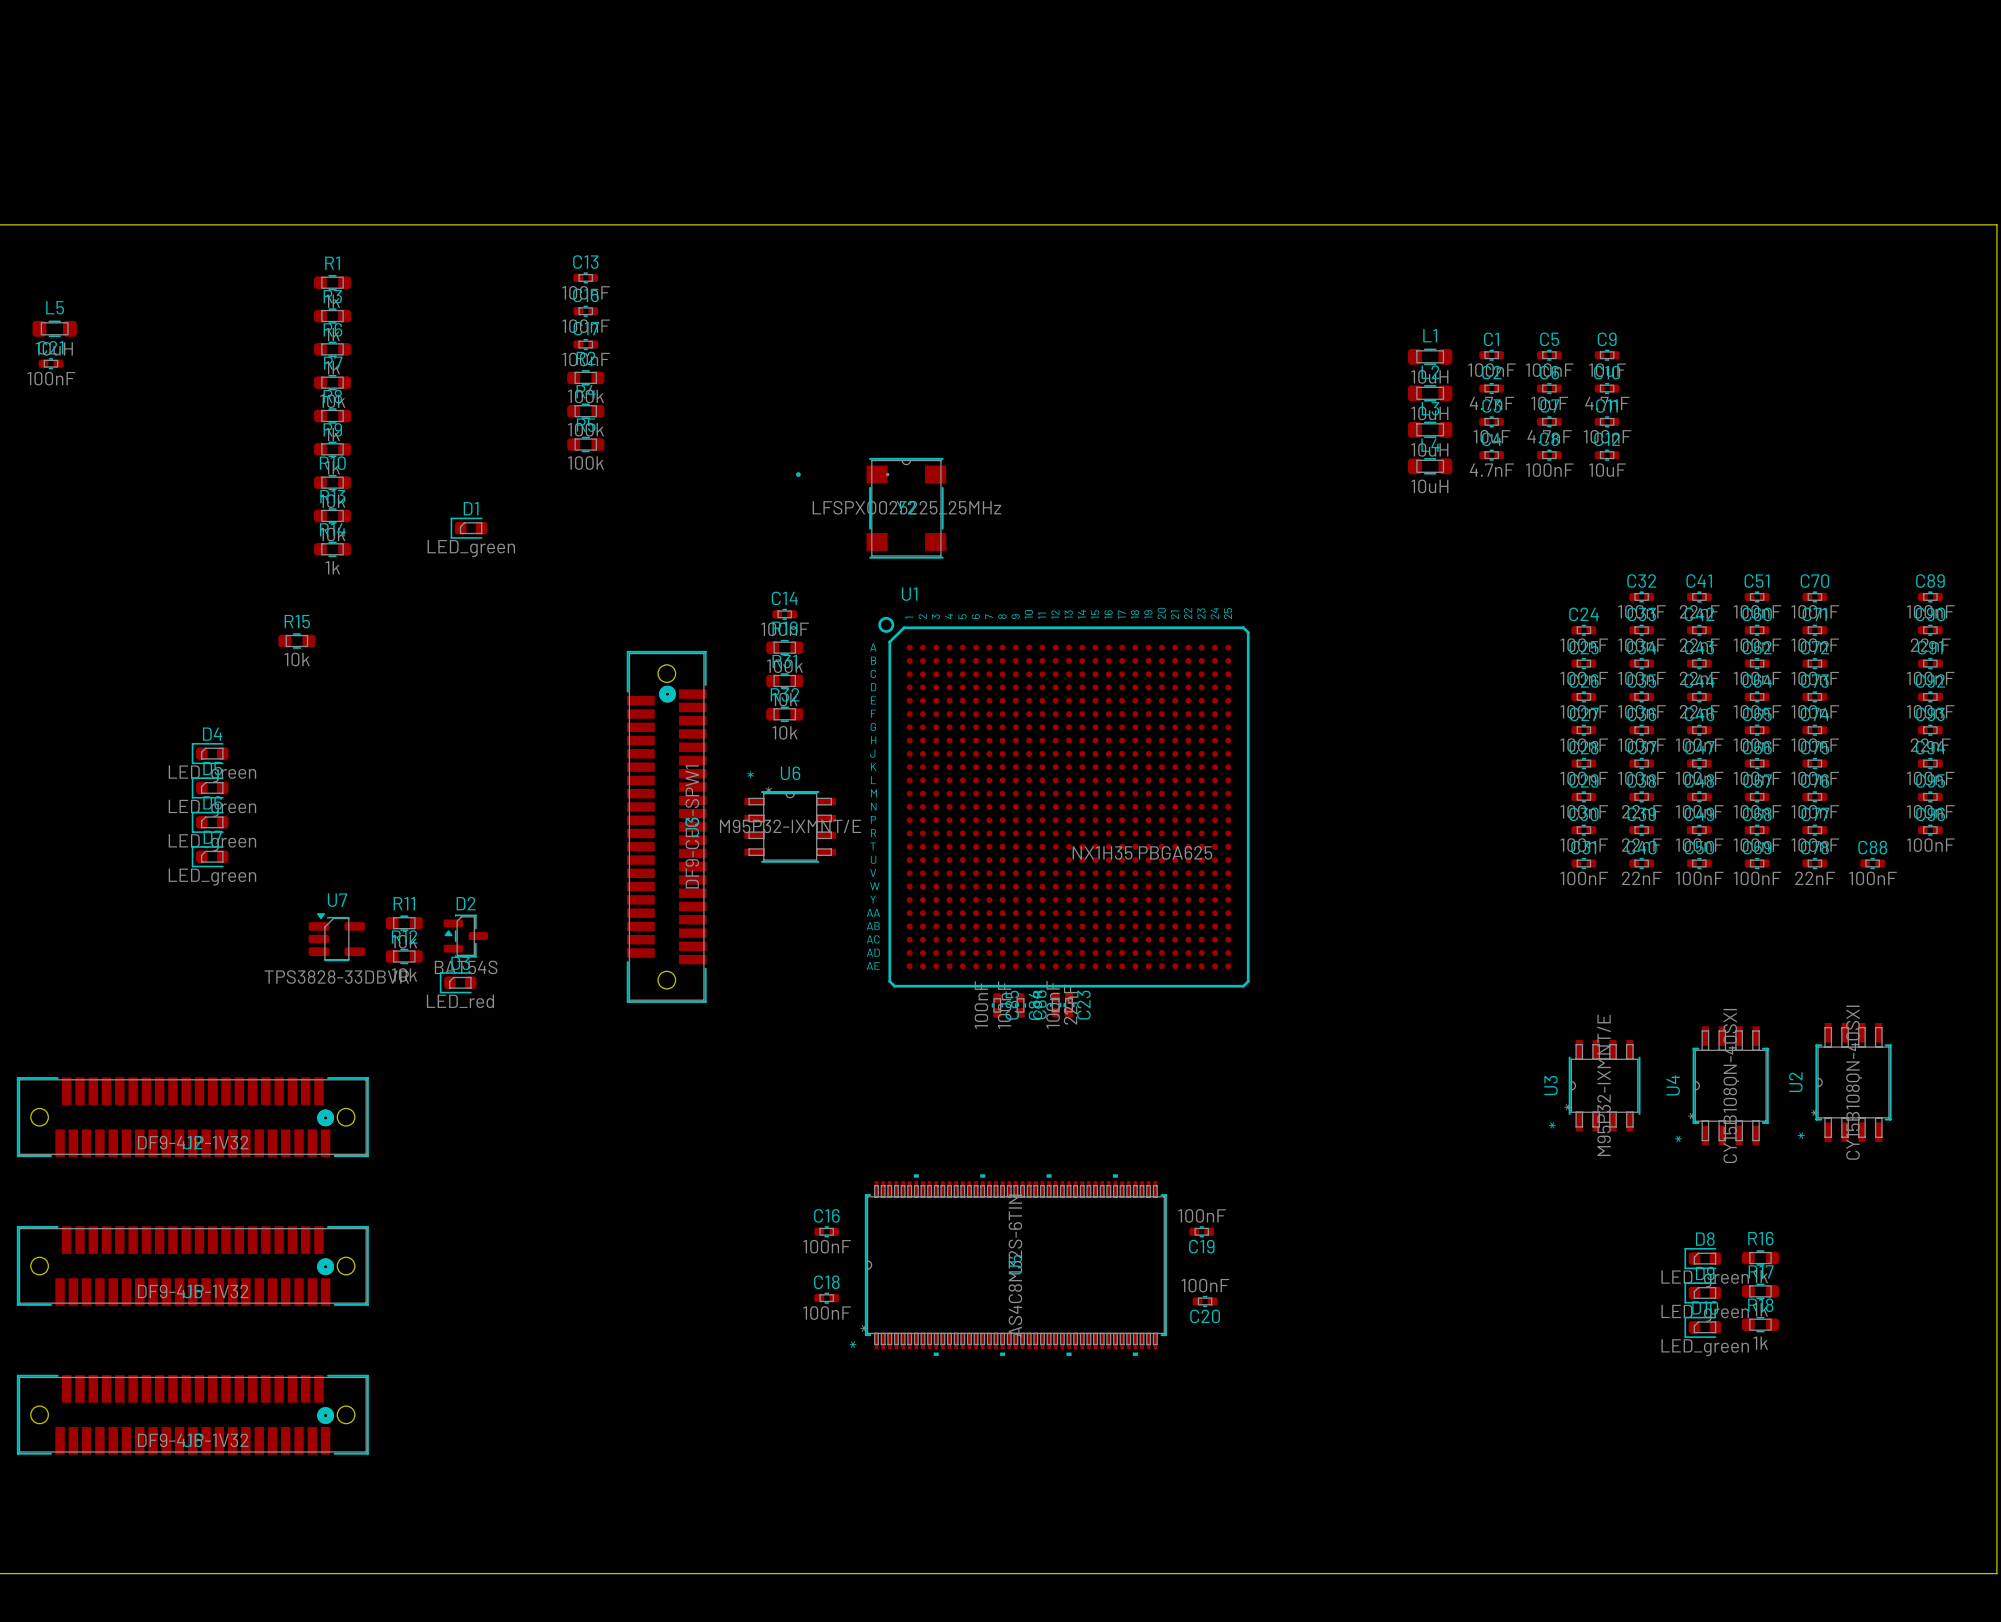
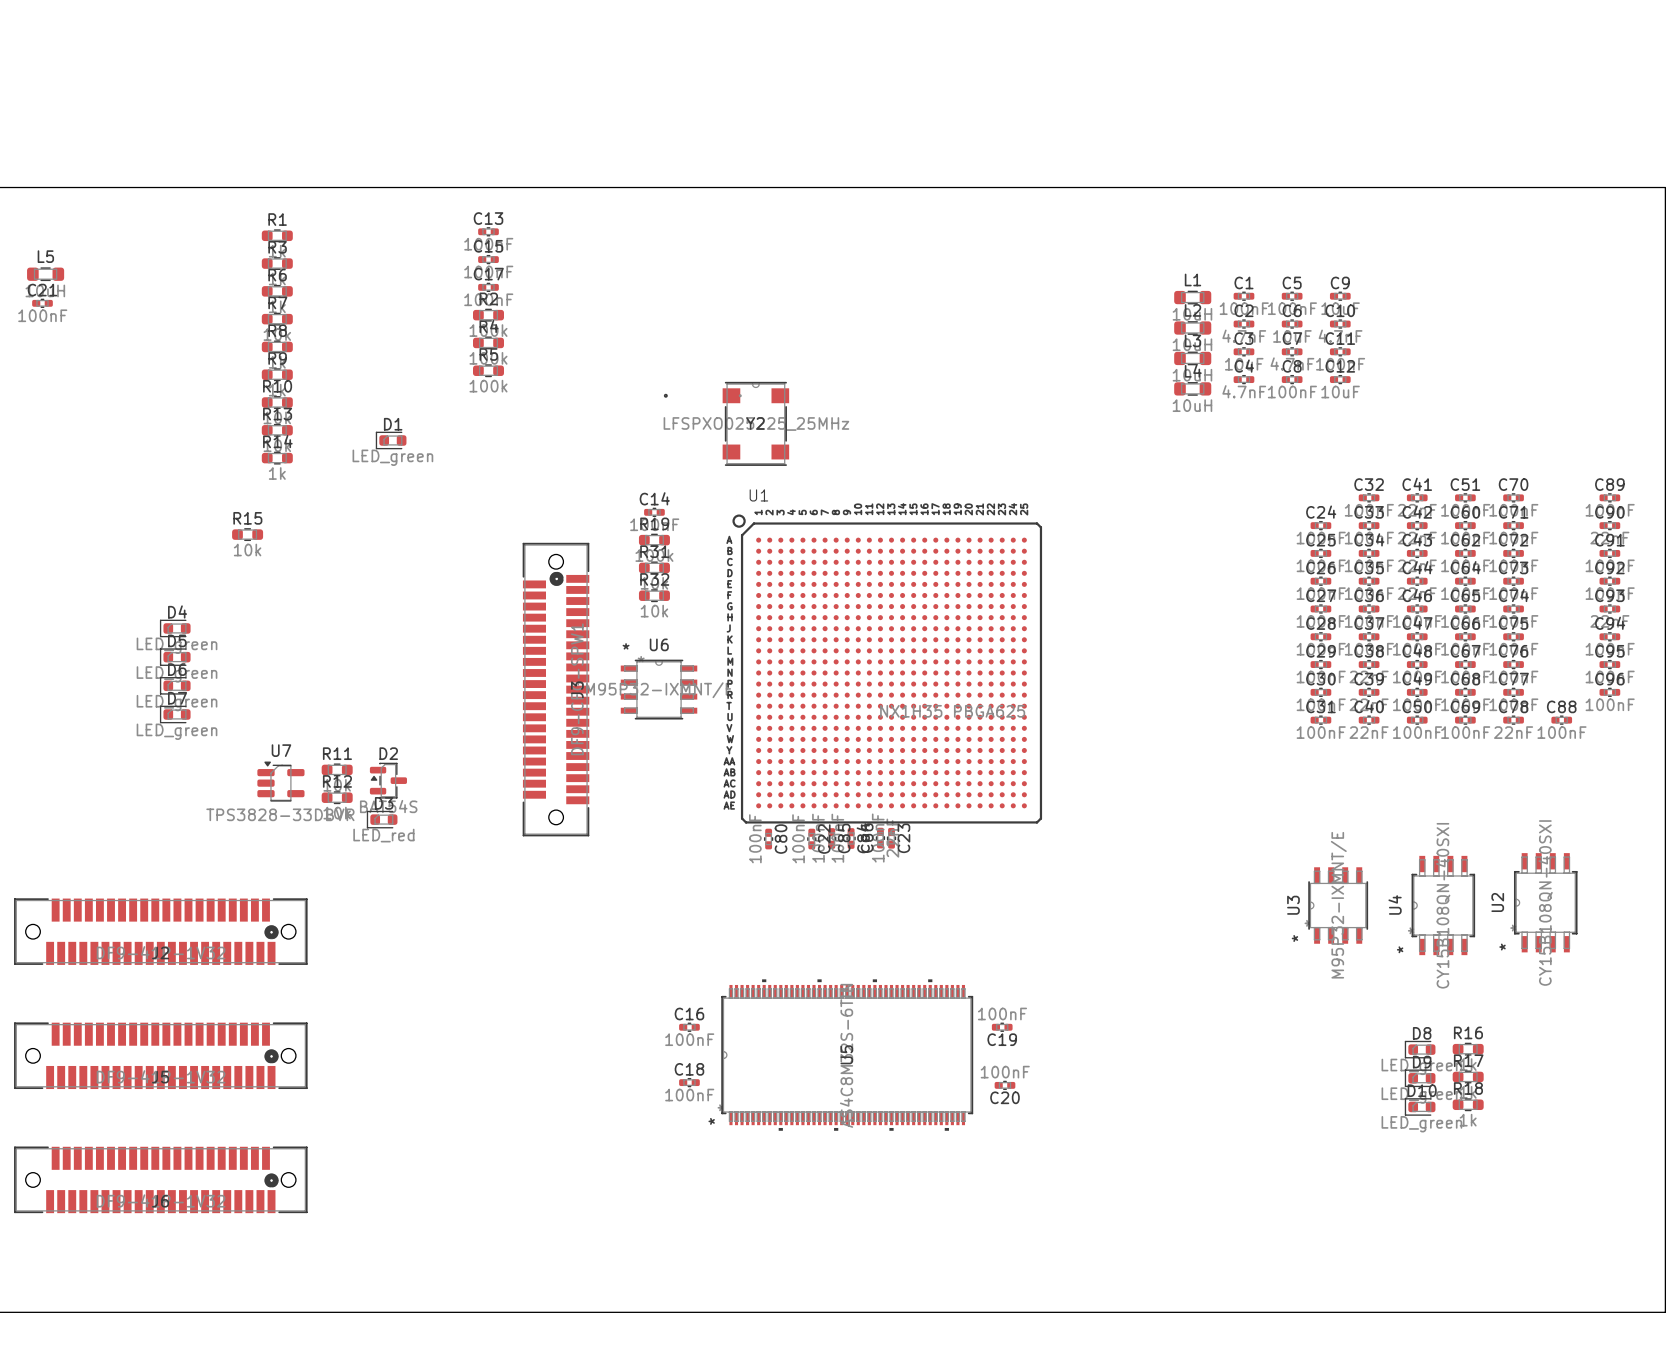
C80: none -> 100nF (768, 839)
C22: none -> 100nF (811, 839)

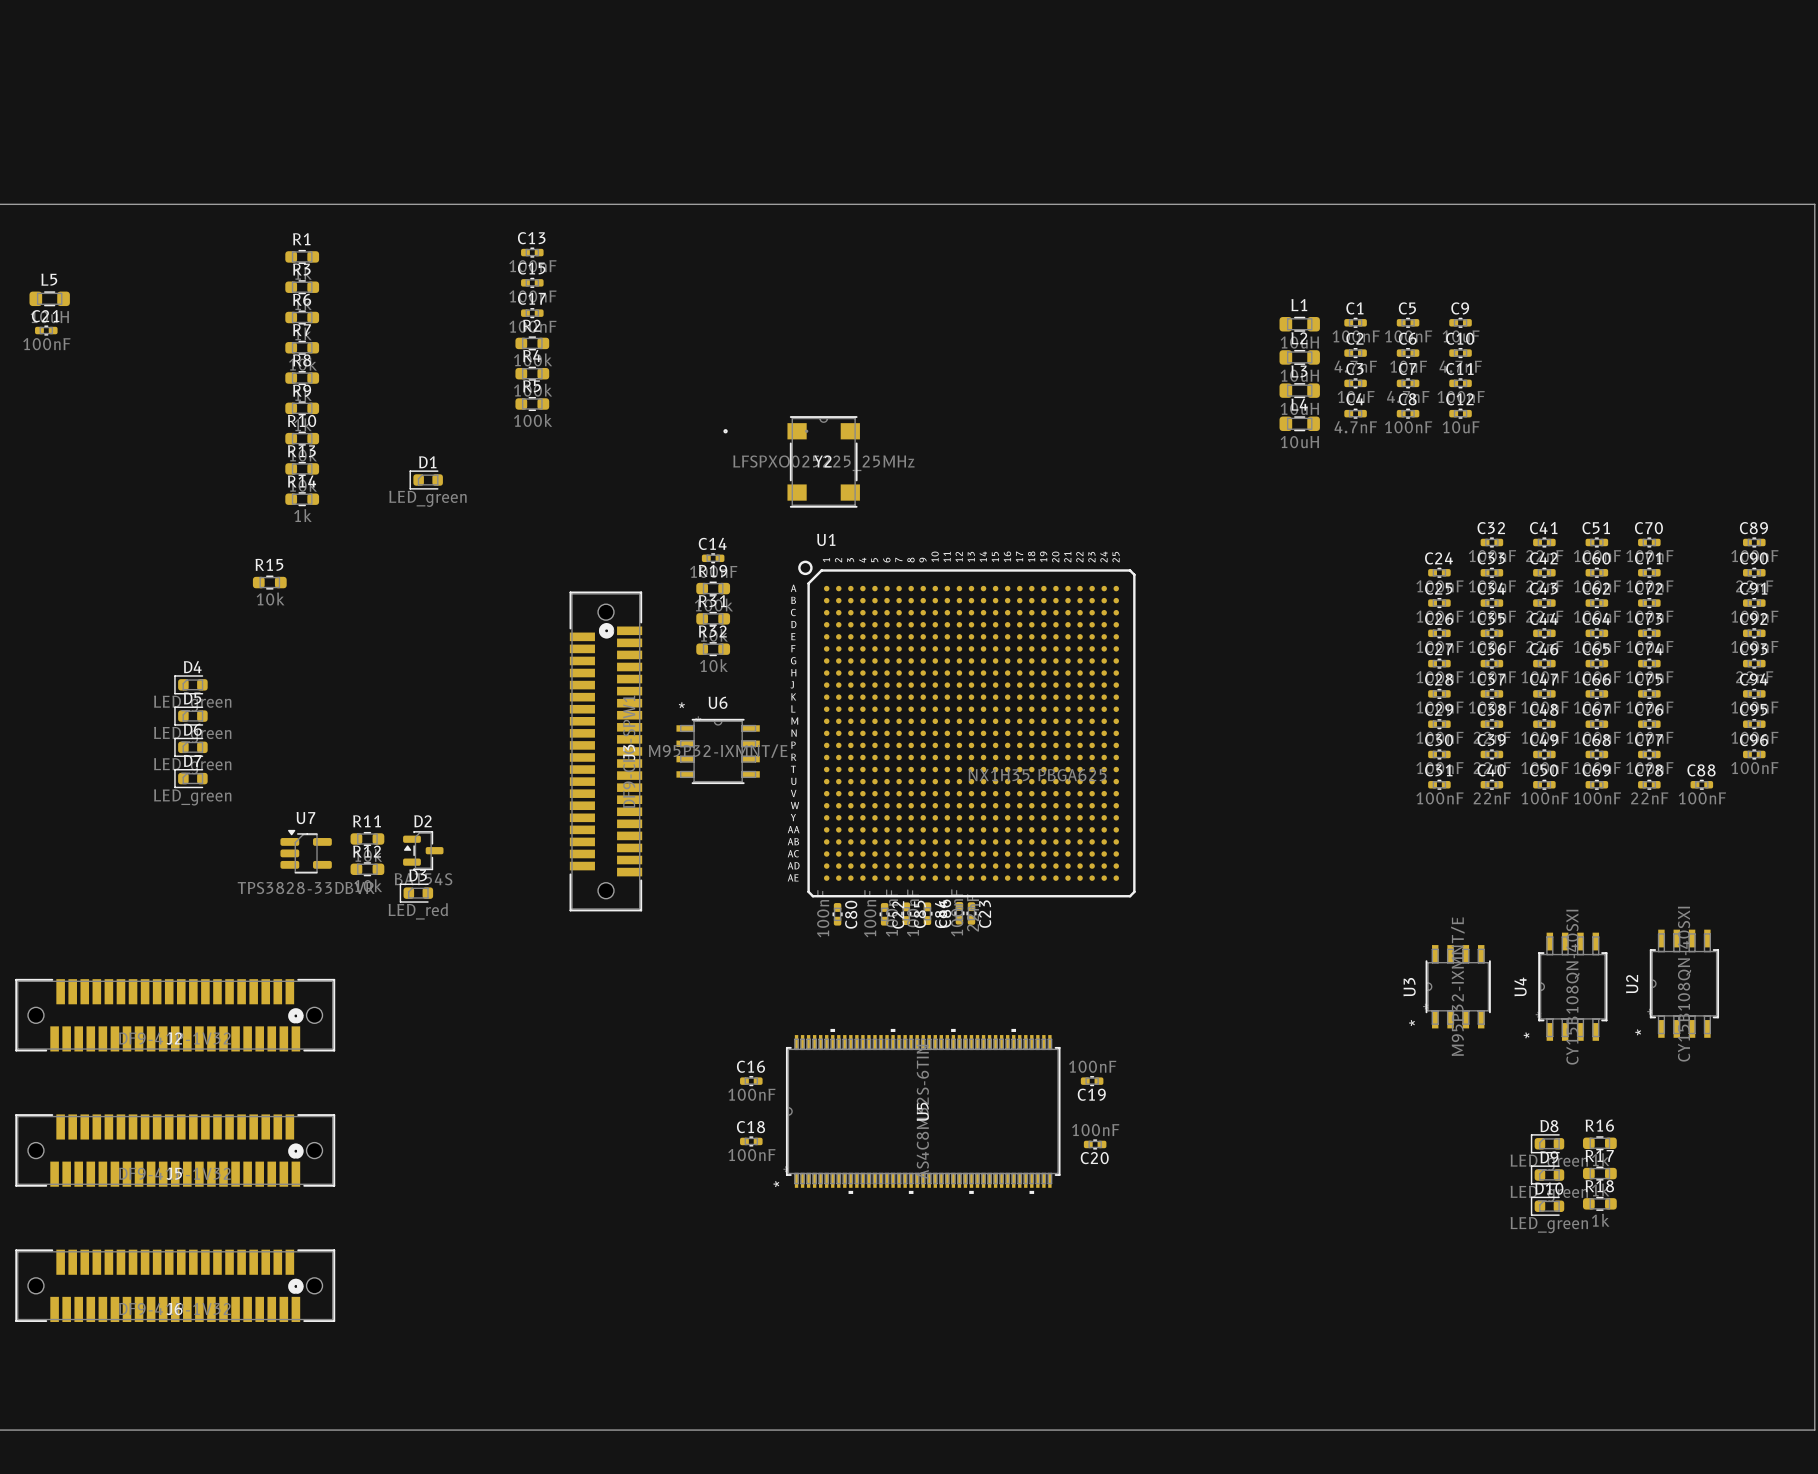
C16 position: (689, 1027) -> (751, 1081)
C19 position: (1002, 1027) -> (1092, 1081)
U5 position: (847, 1055) -> (923, 1111)
C18 position: (689, 1082) -> (751, 1141)
C20 position: (1004, 1085) -> (1095, 1144)

